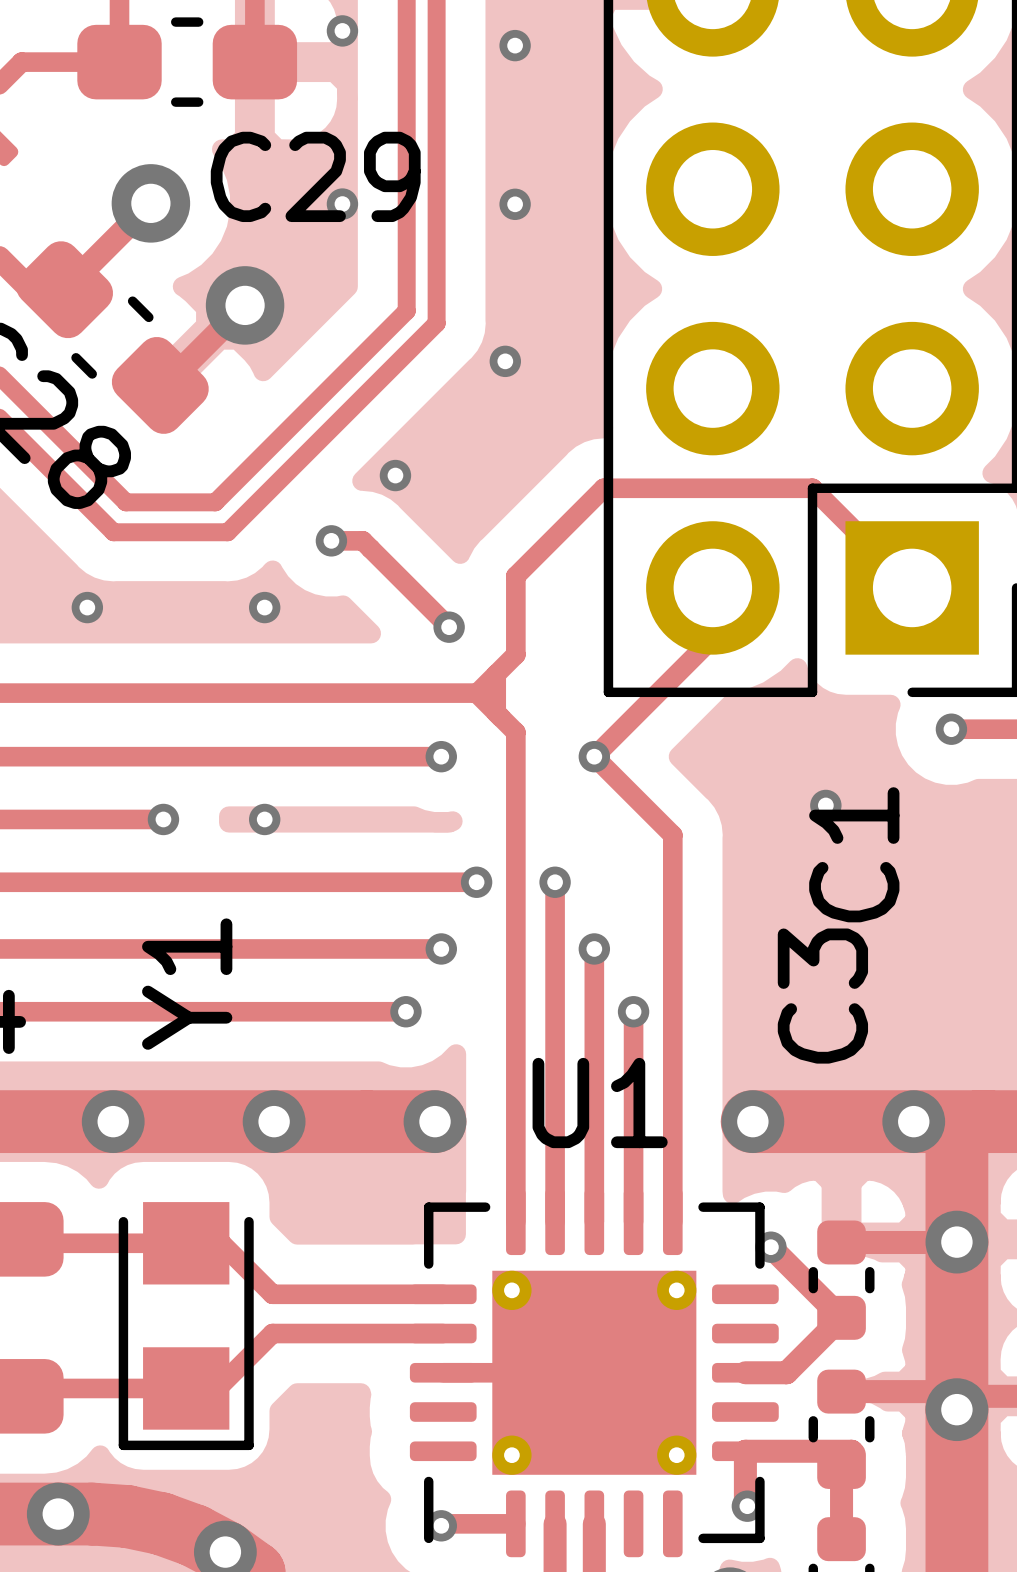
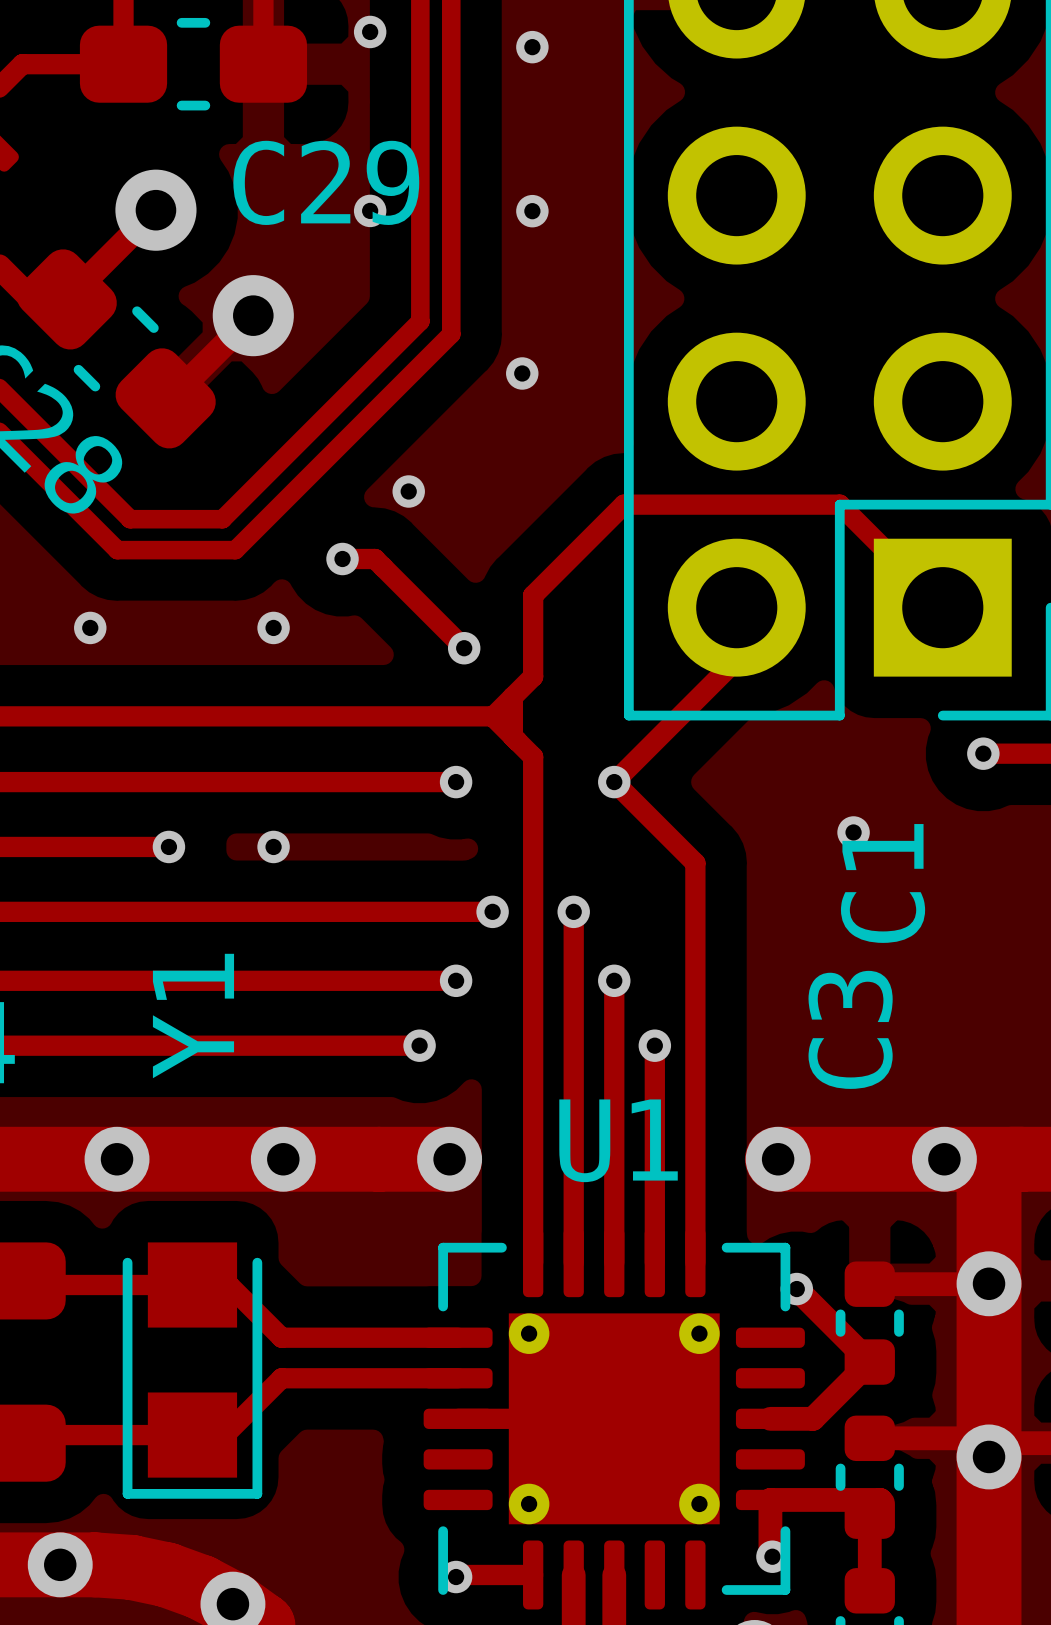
via position: (342, 30) -> (370, 31)
via position: (342, 204) -> (370, 210)

